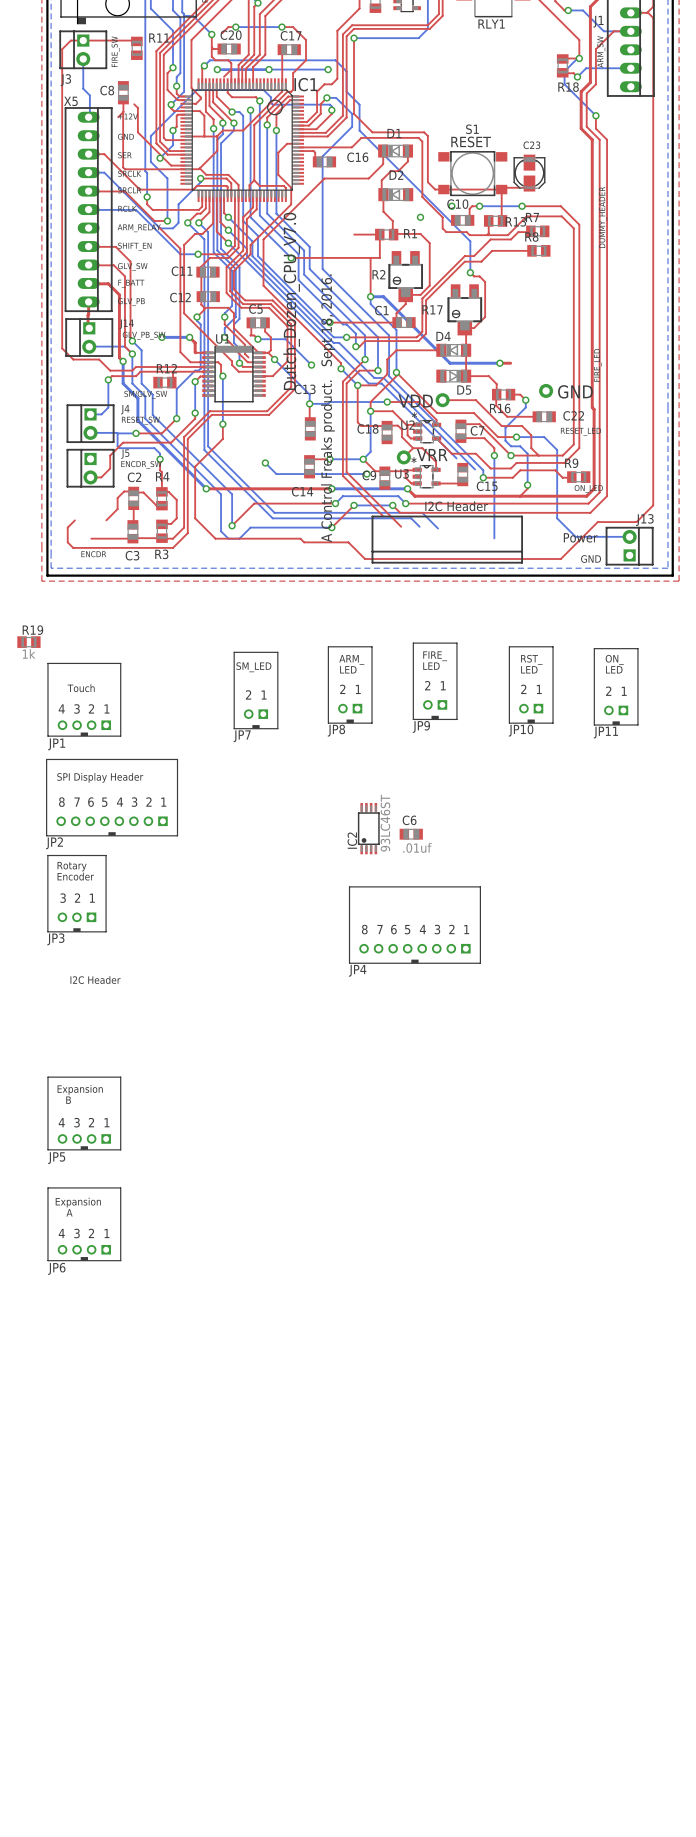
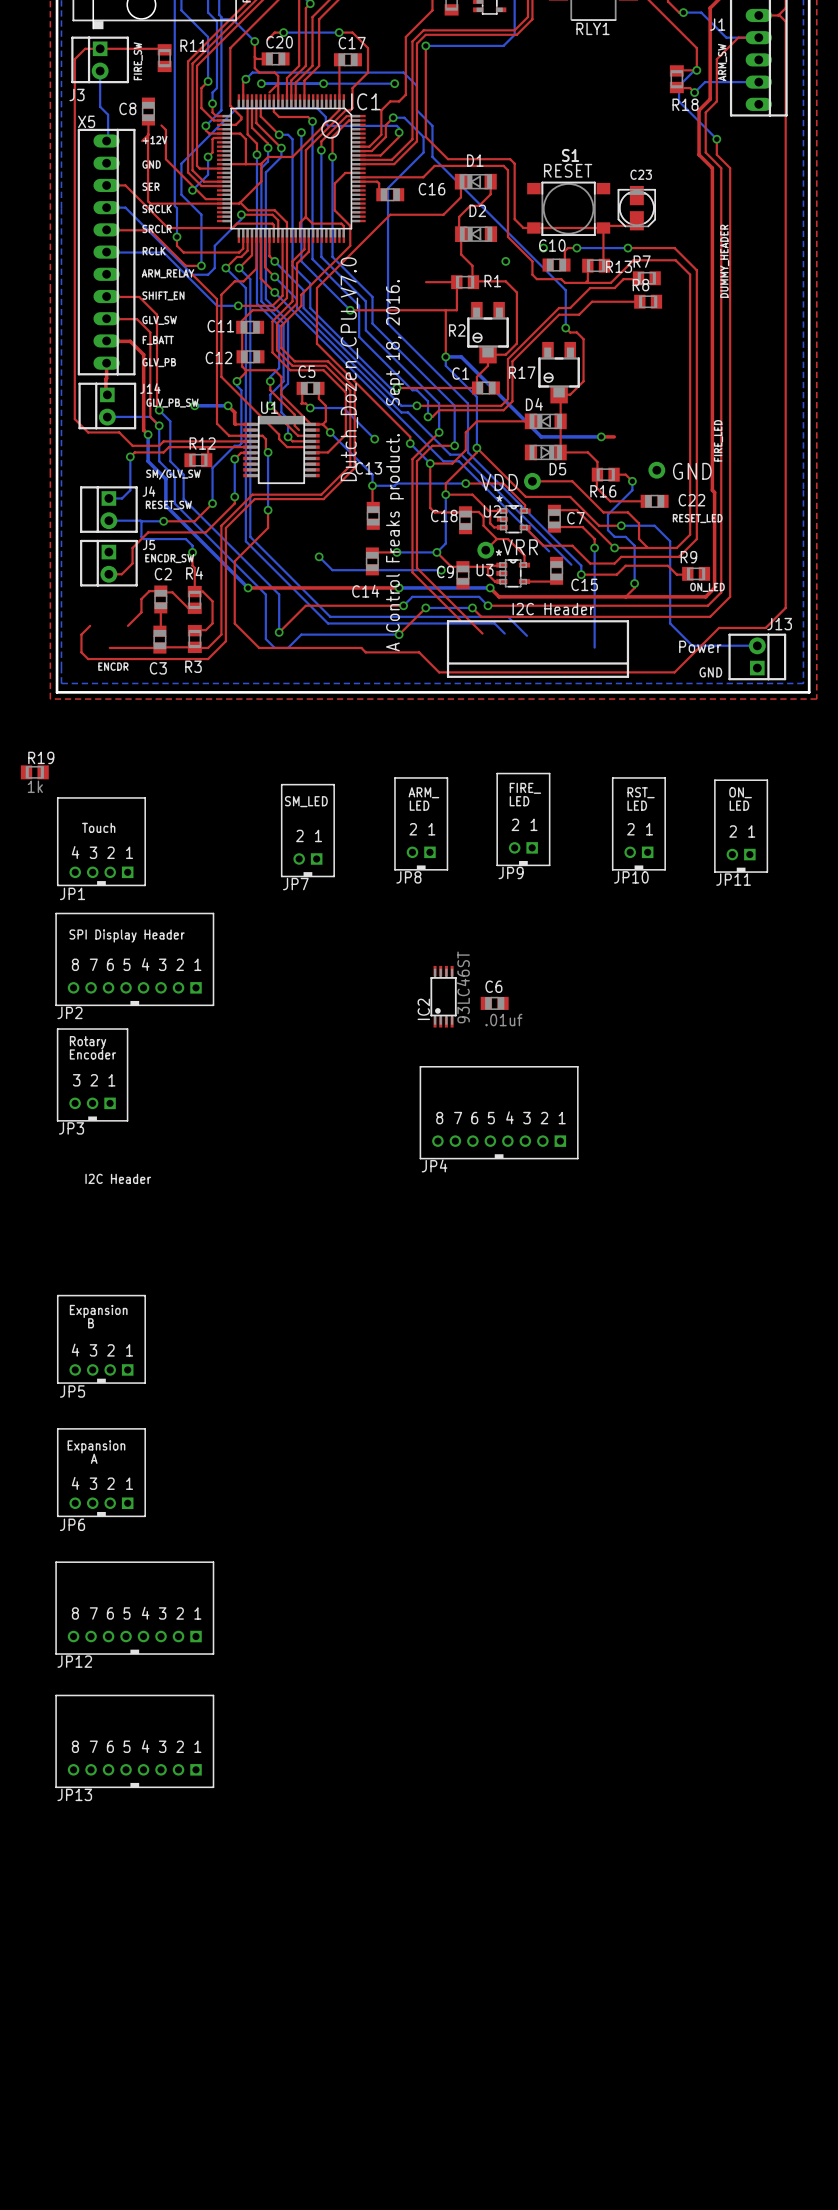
JP12: none -> (134, 1608)
JP13: none -> (134, 1741)

